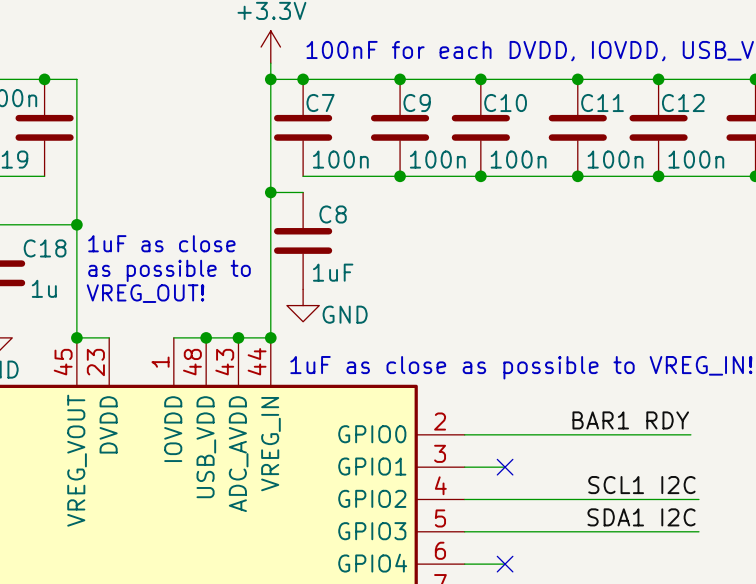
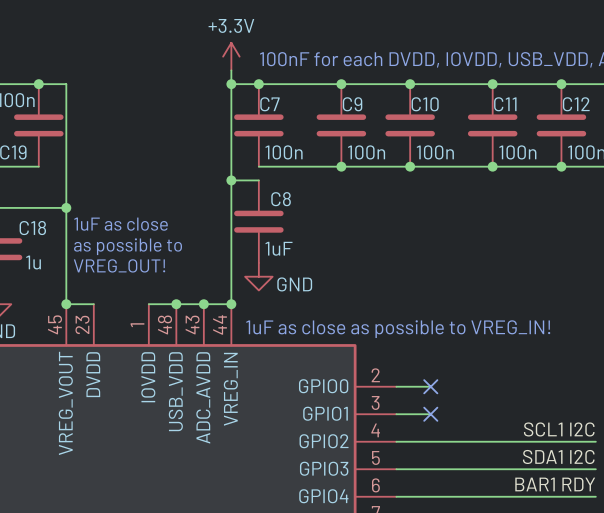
label position: BAR1 RDY (630, 420) -> BAR1 RDY (555, 484)
wire: (505, 434) (690, 434) -> none
no-connect mark: none -> (430, 386)
wire: none -> (430, 496) (595, 496)
no-connect mark: (505, 564) -> none

